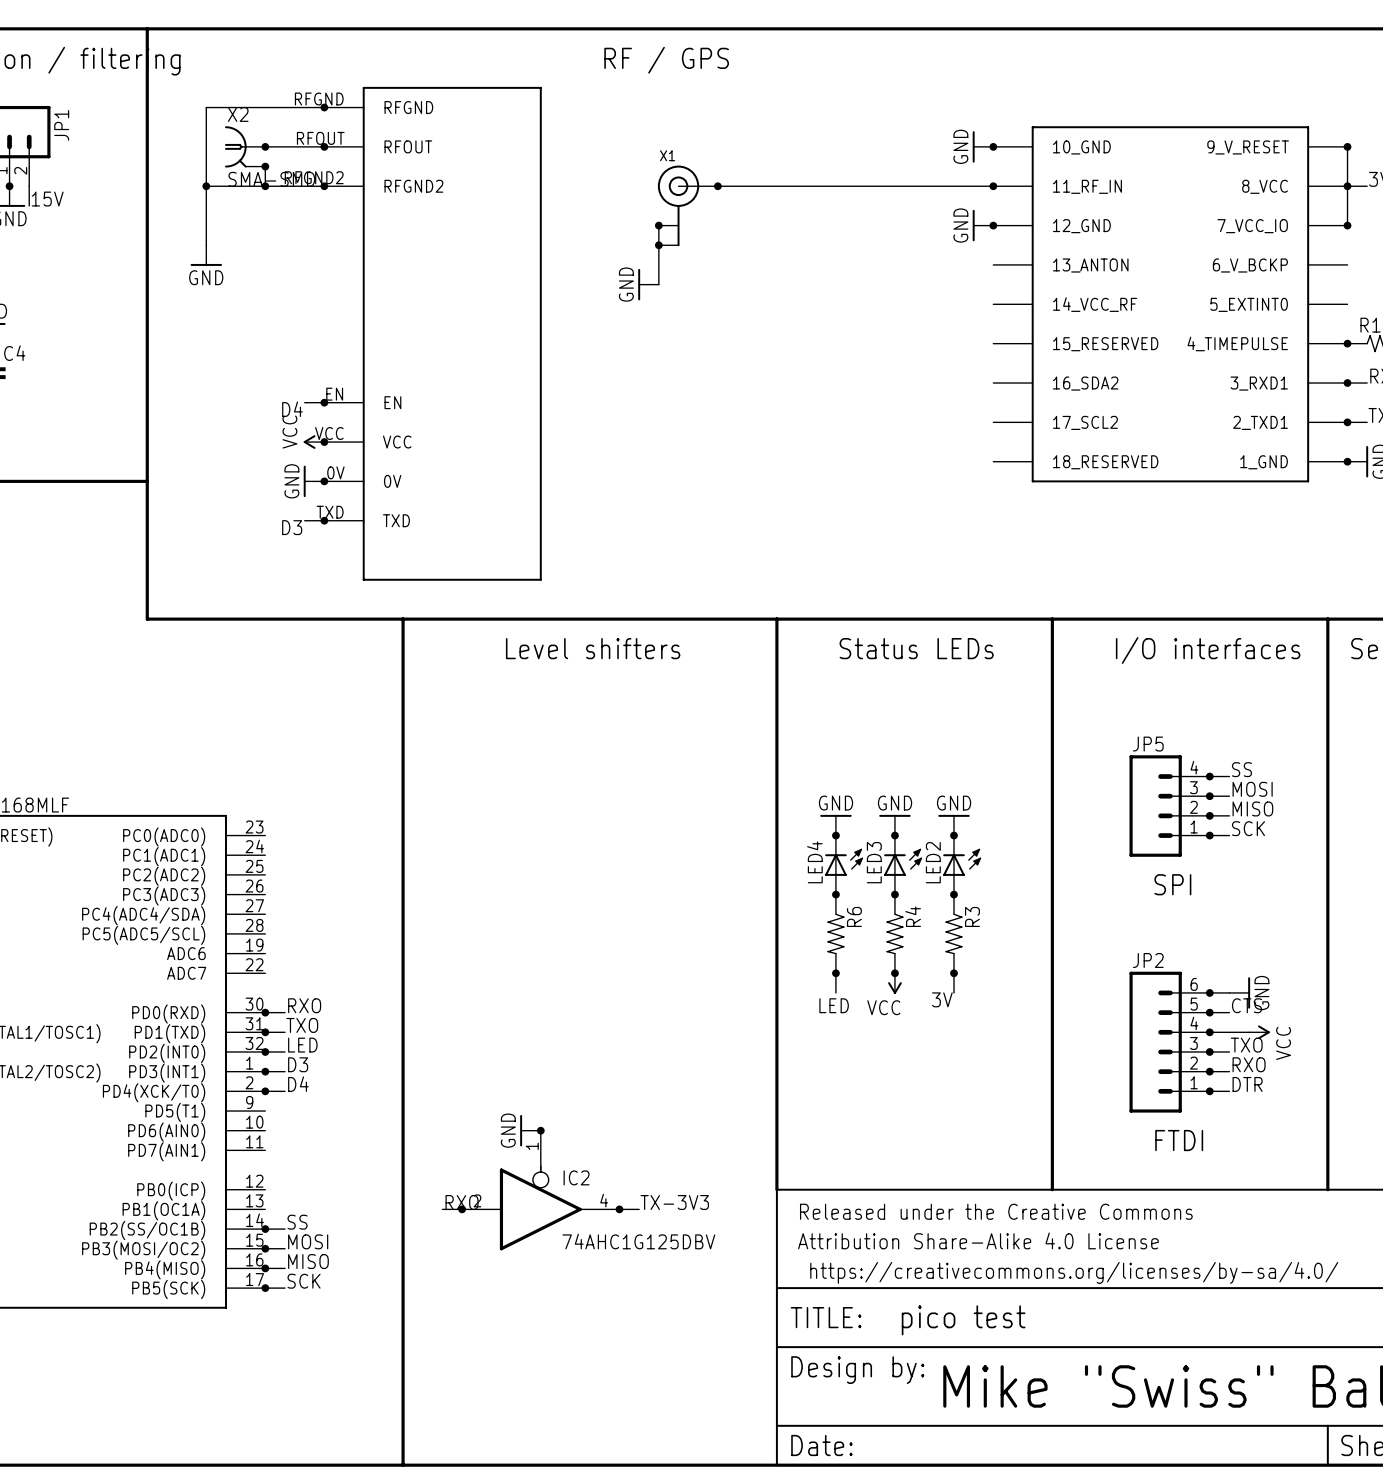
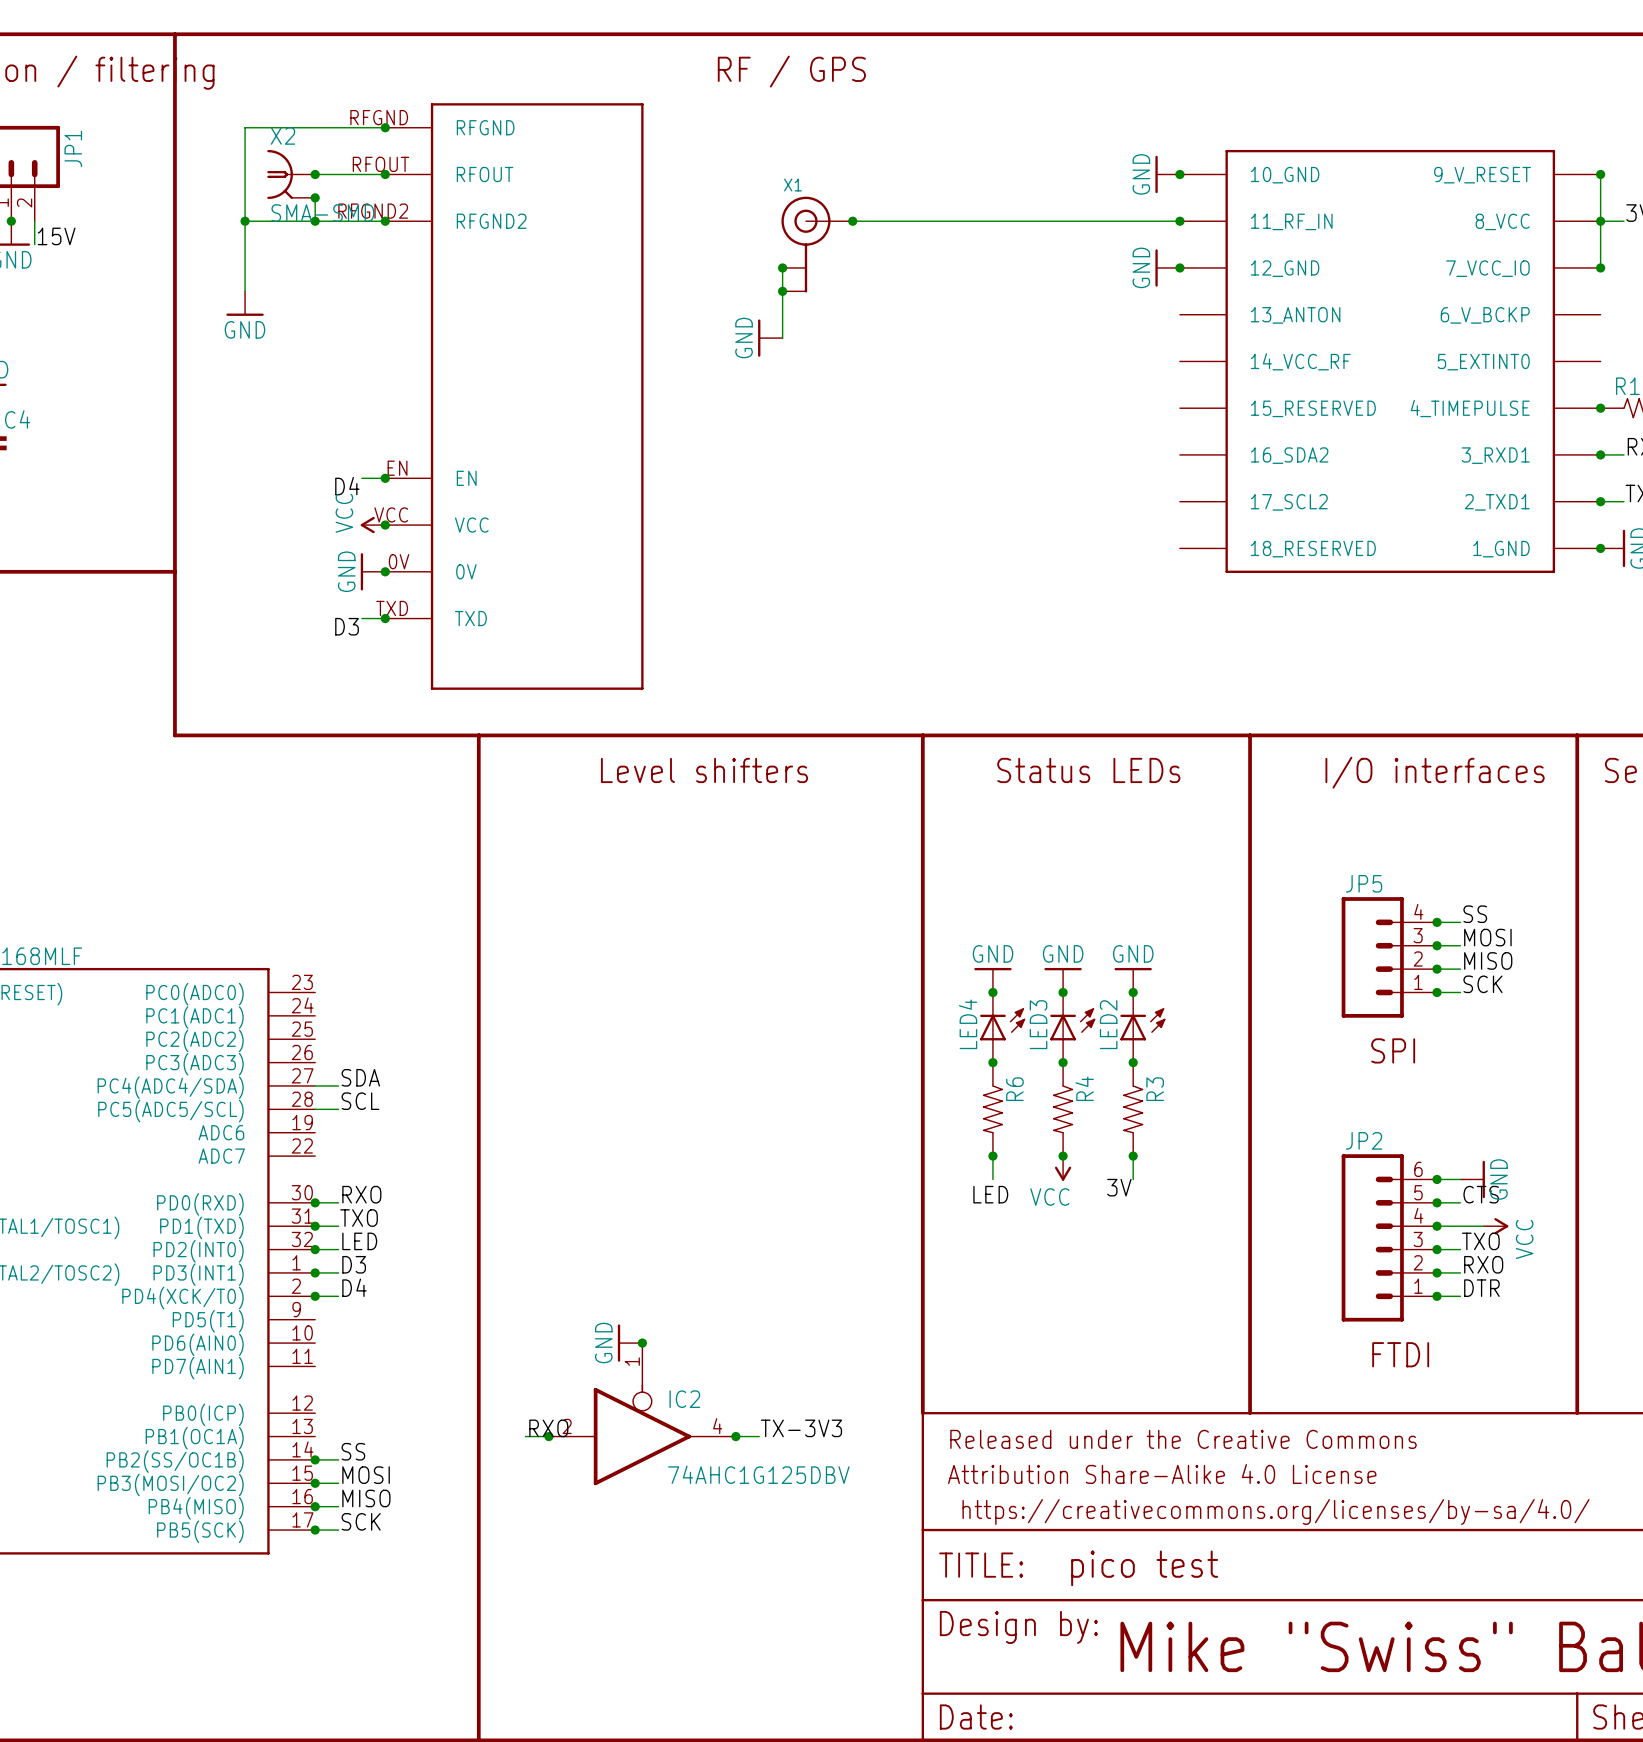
label: none -> SDA (360, 1077)
wire: none -> (315, 1085) (338, 1085)
label: none -> SCL (360, 1101)
wire: none -> (315, 1109) (338, 1109)

